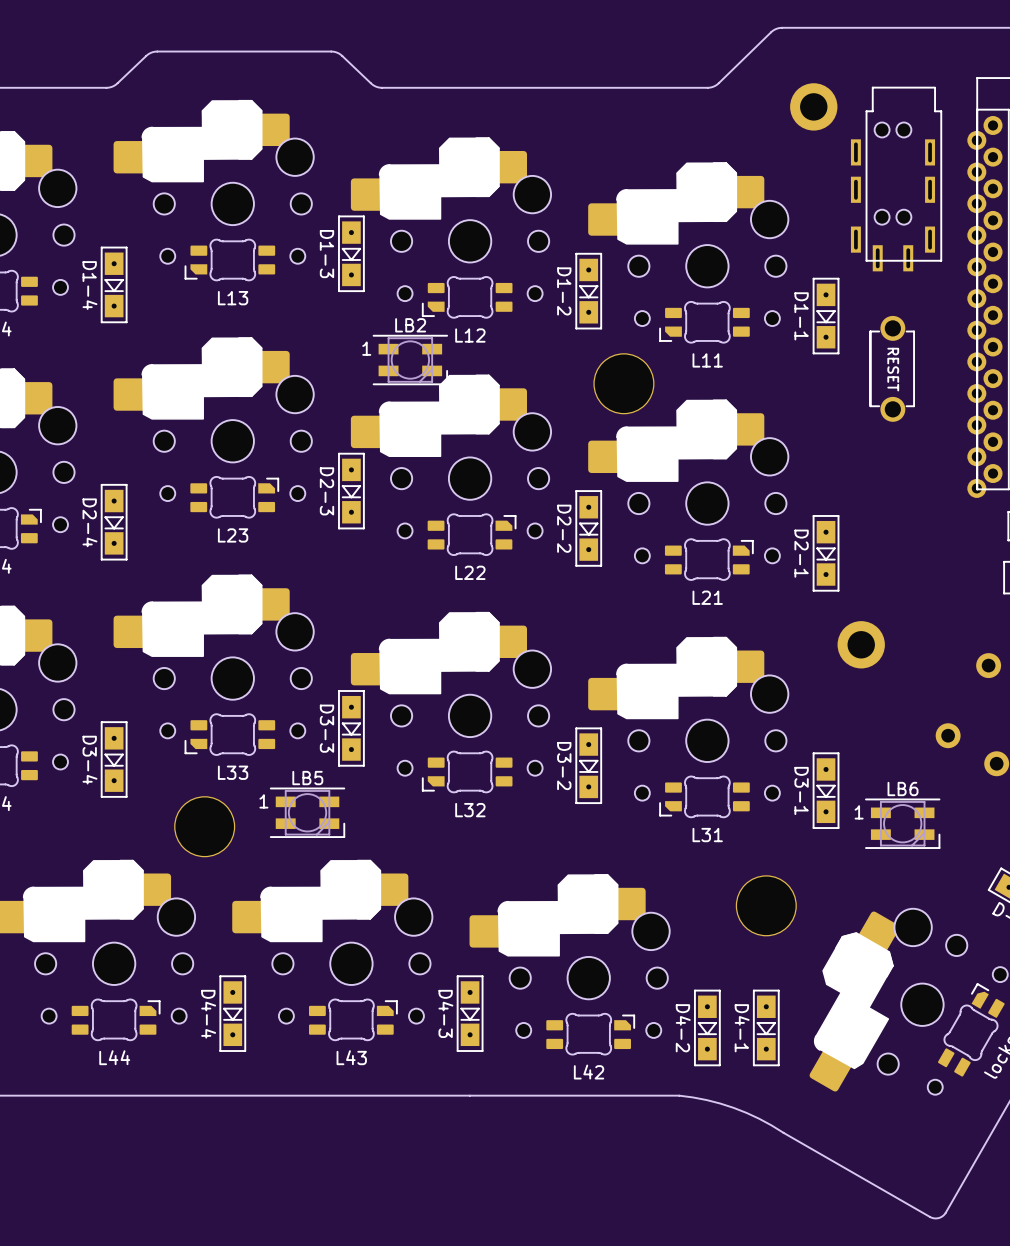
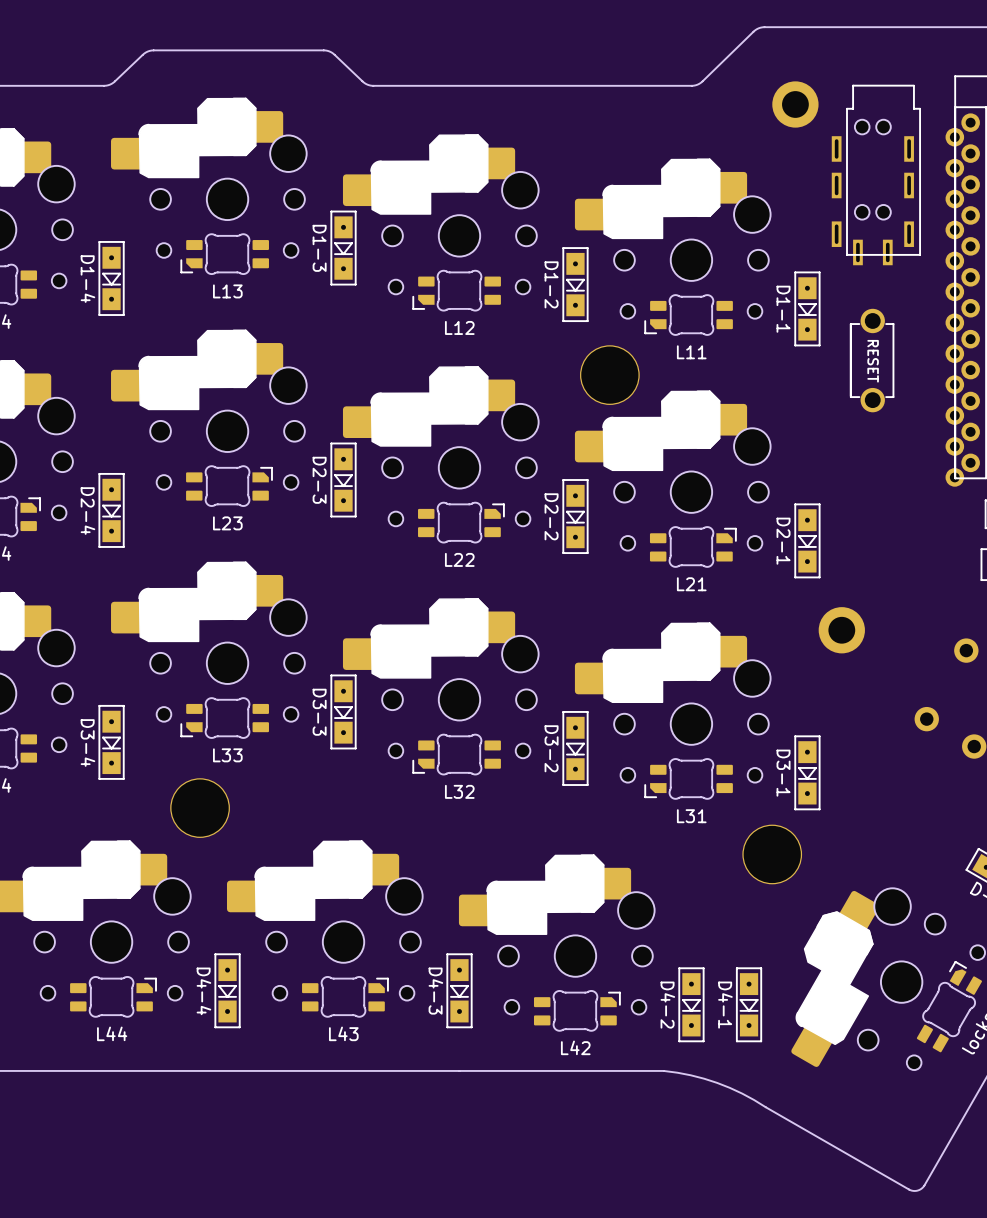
LB2: (410, 360) -> none
LB5: (307, 812) -> none
LB6: (902, 823) -> none
part position: (766, 905) -> (772, 854)

